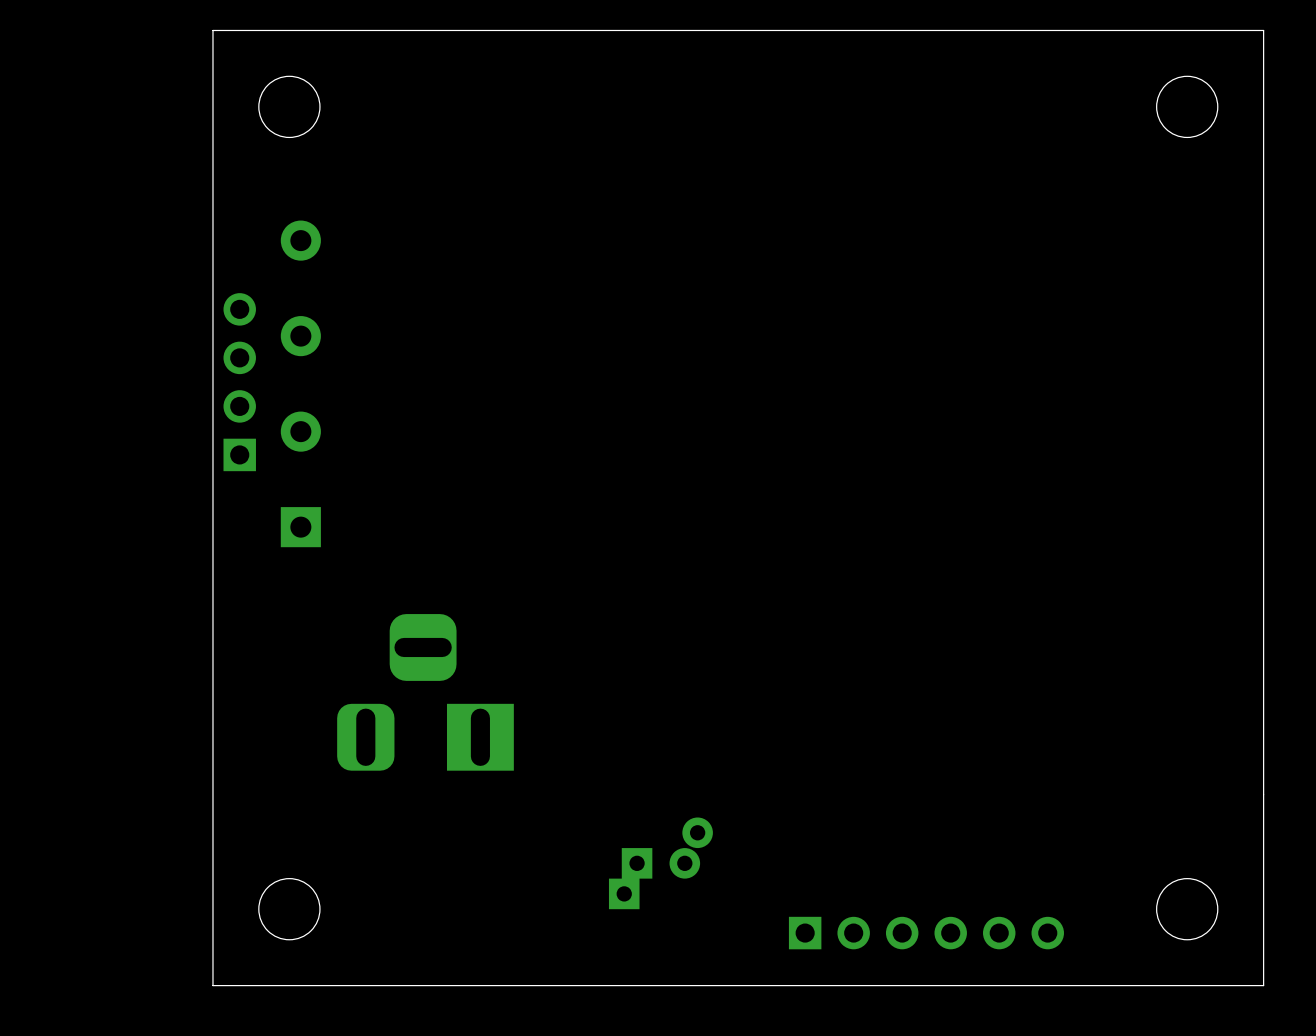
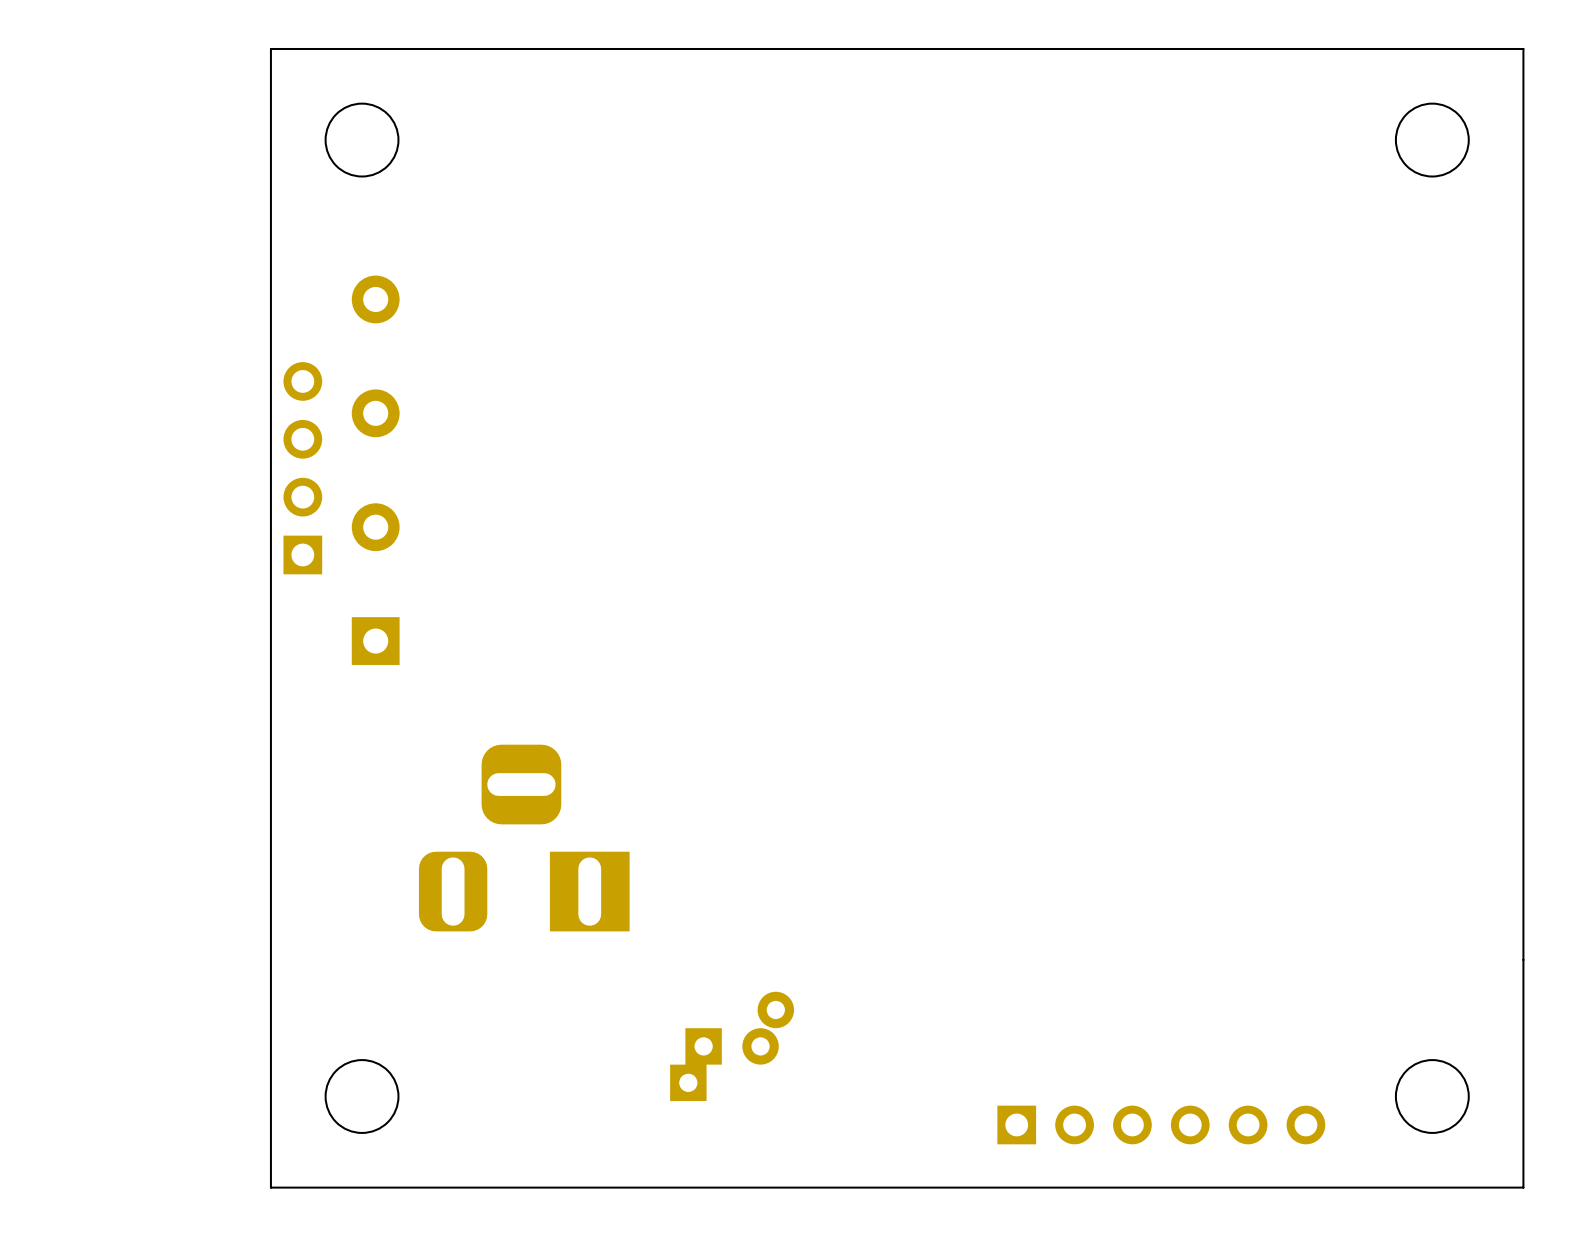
part position: (660, 863) -> (732, 1046)
part position: (926, 933) -> (1161, 1124)

